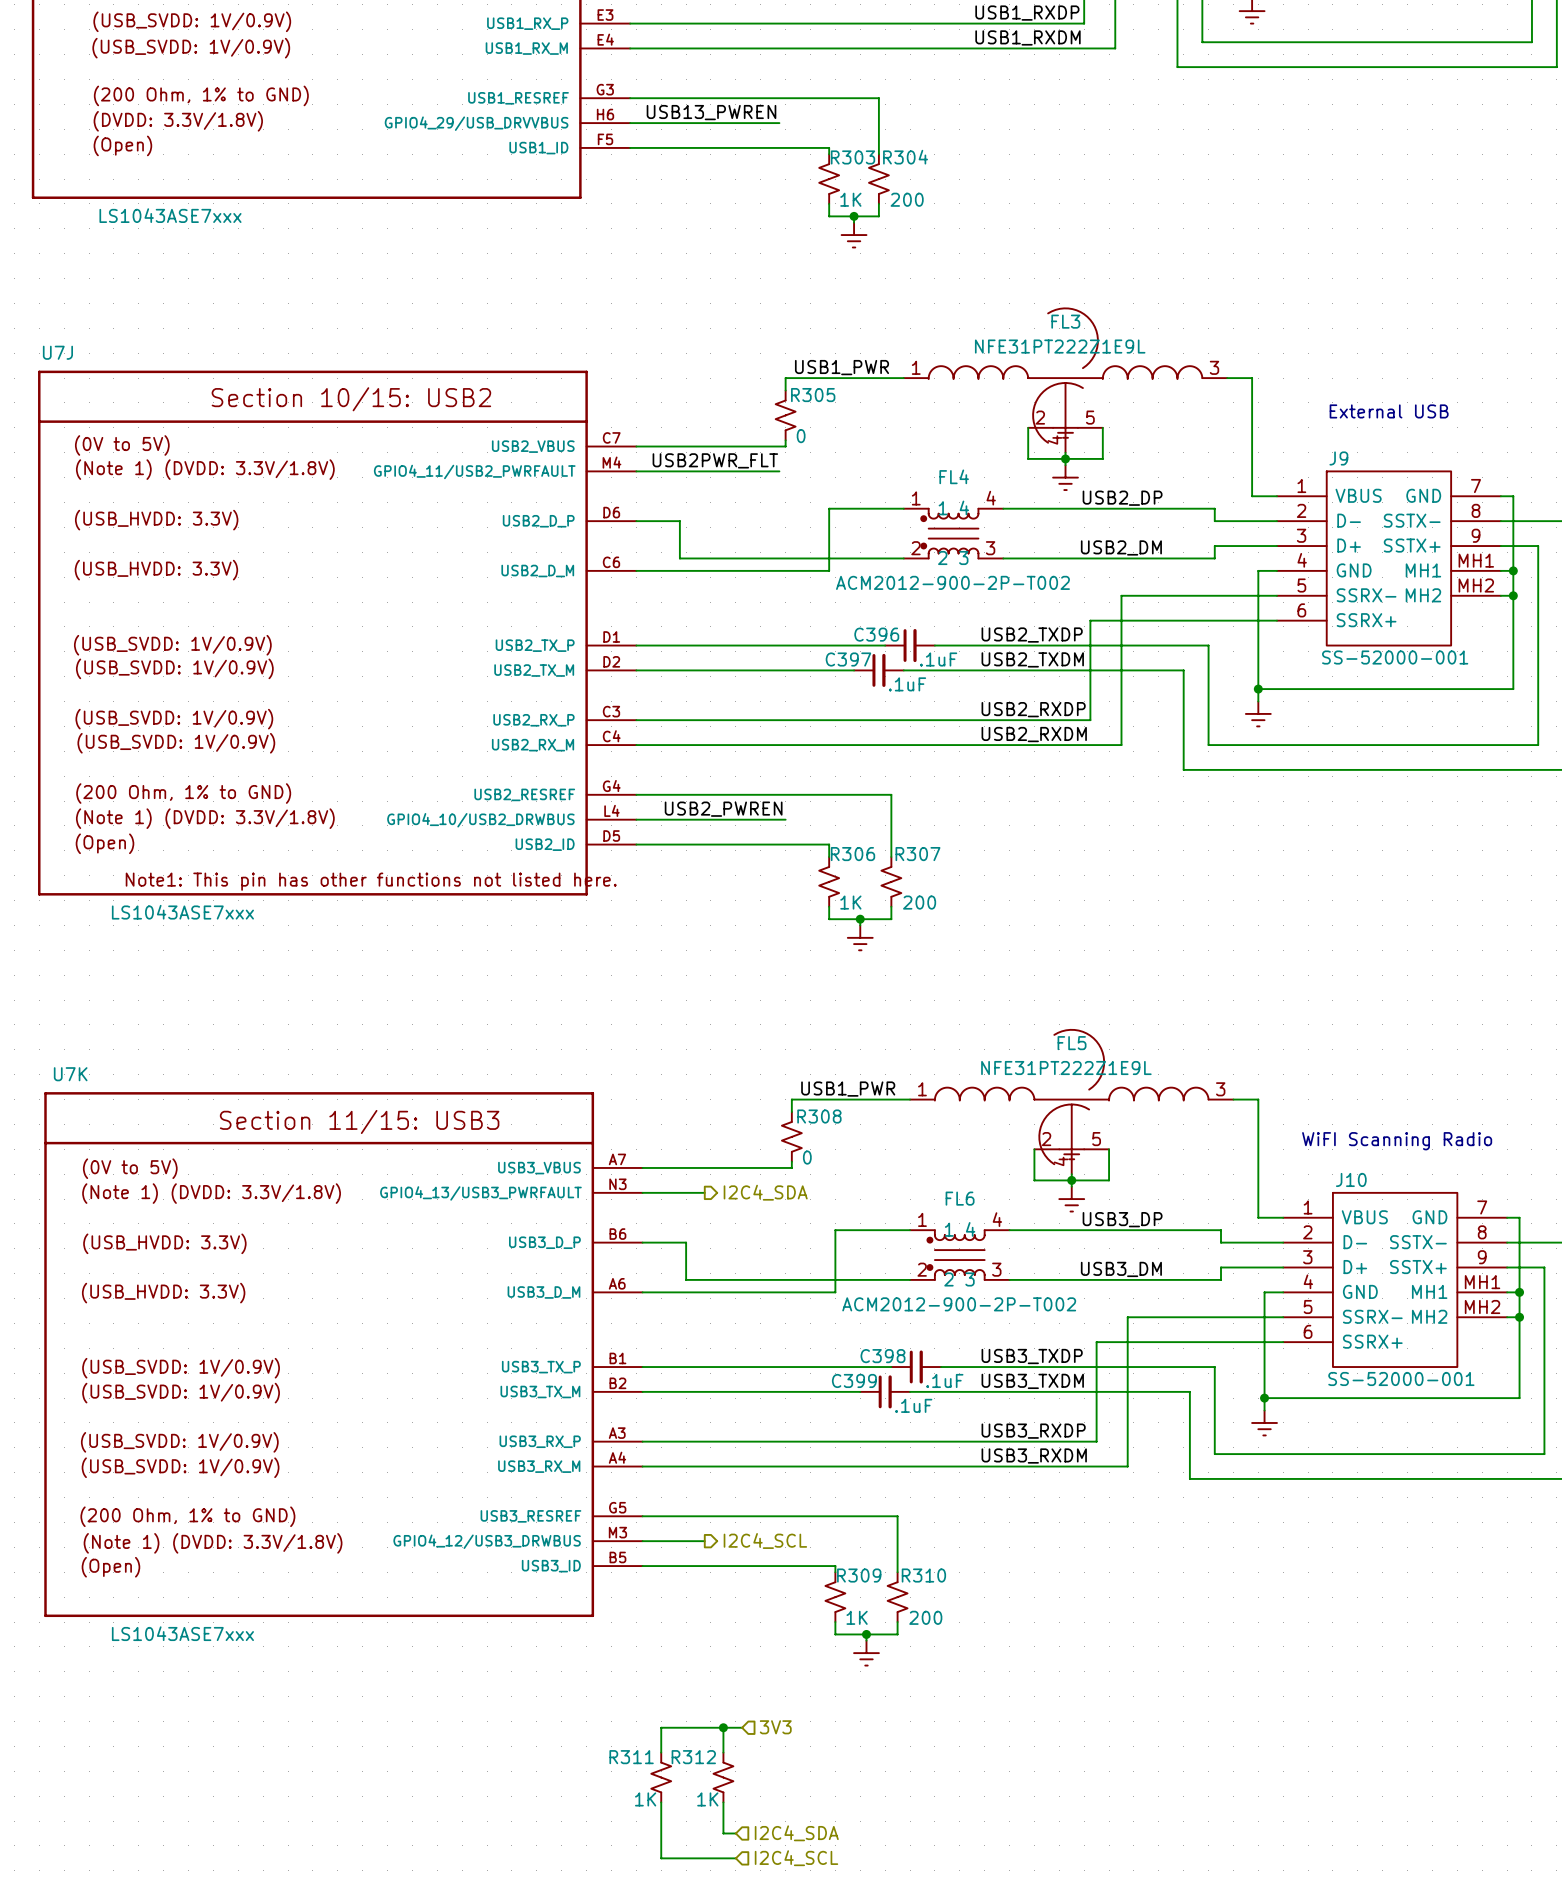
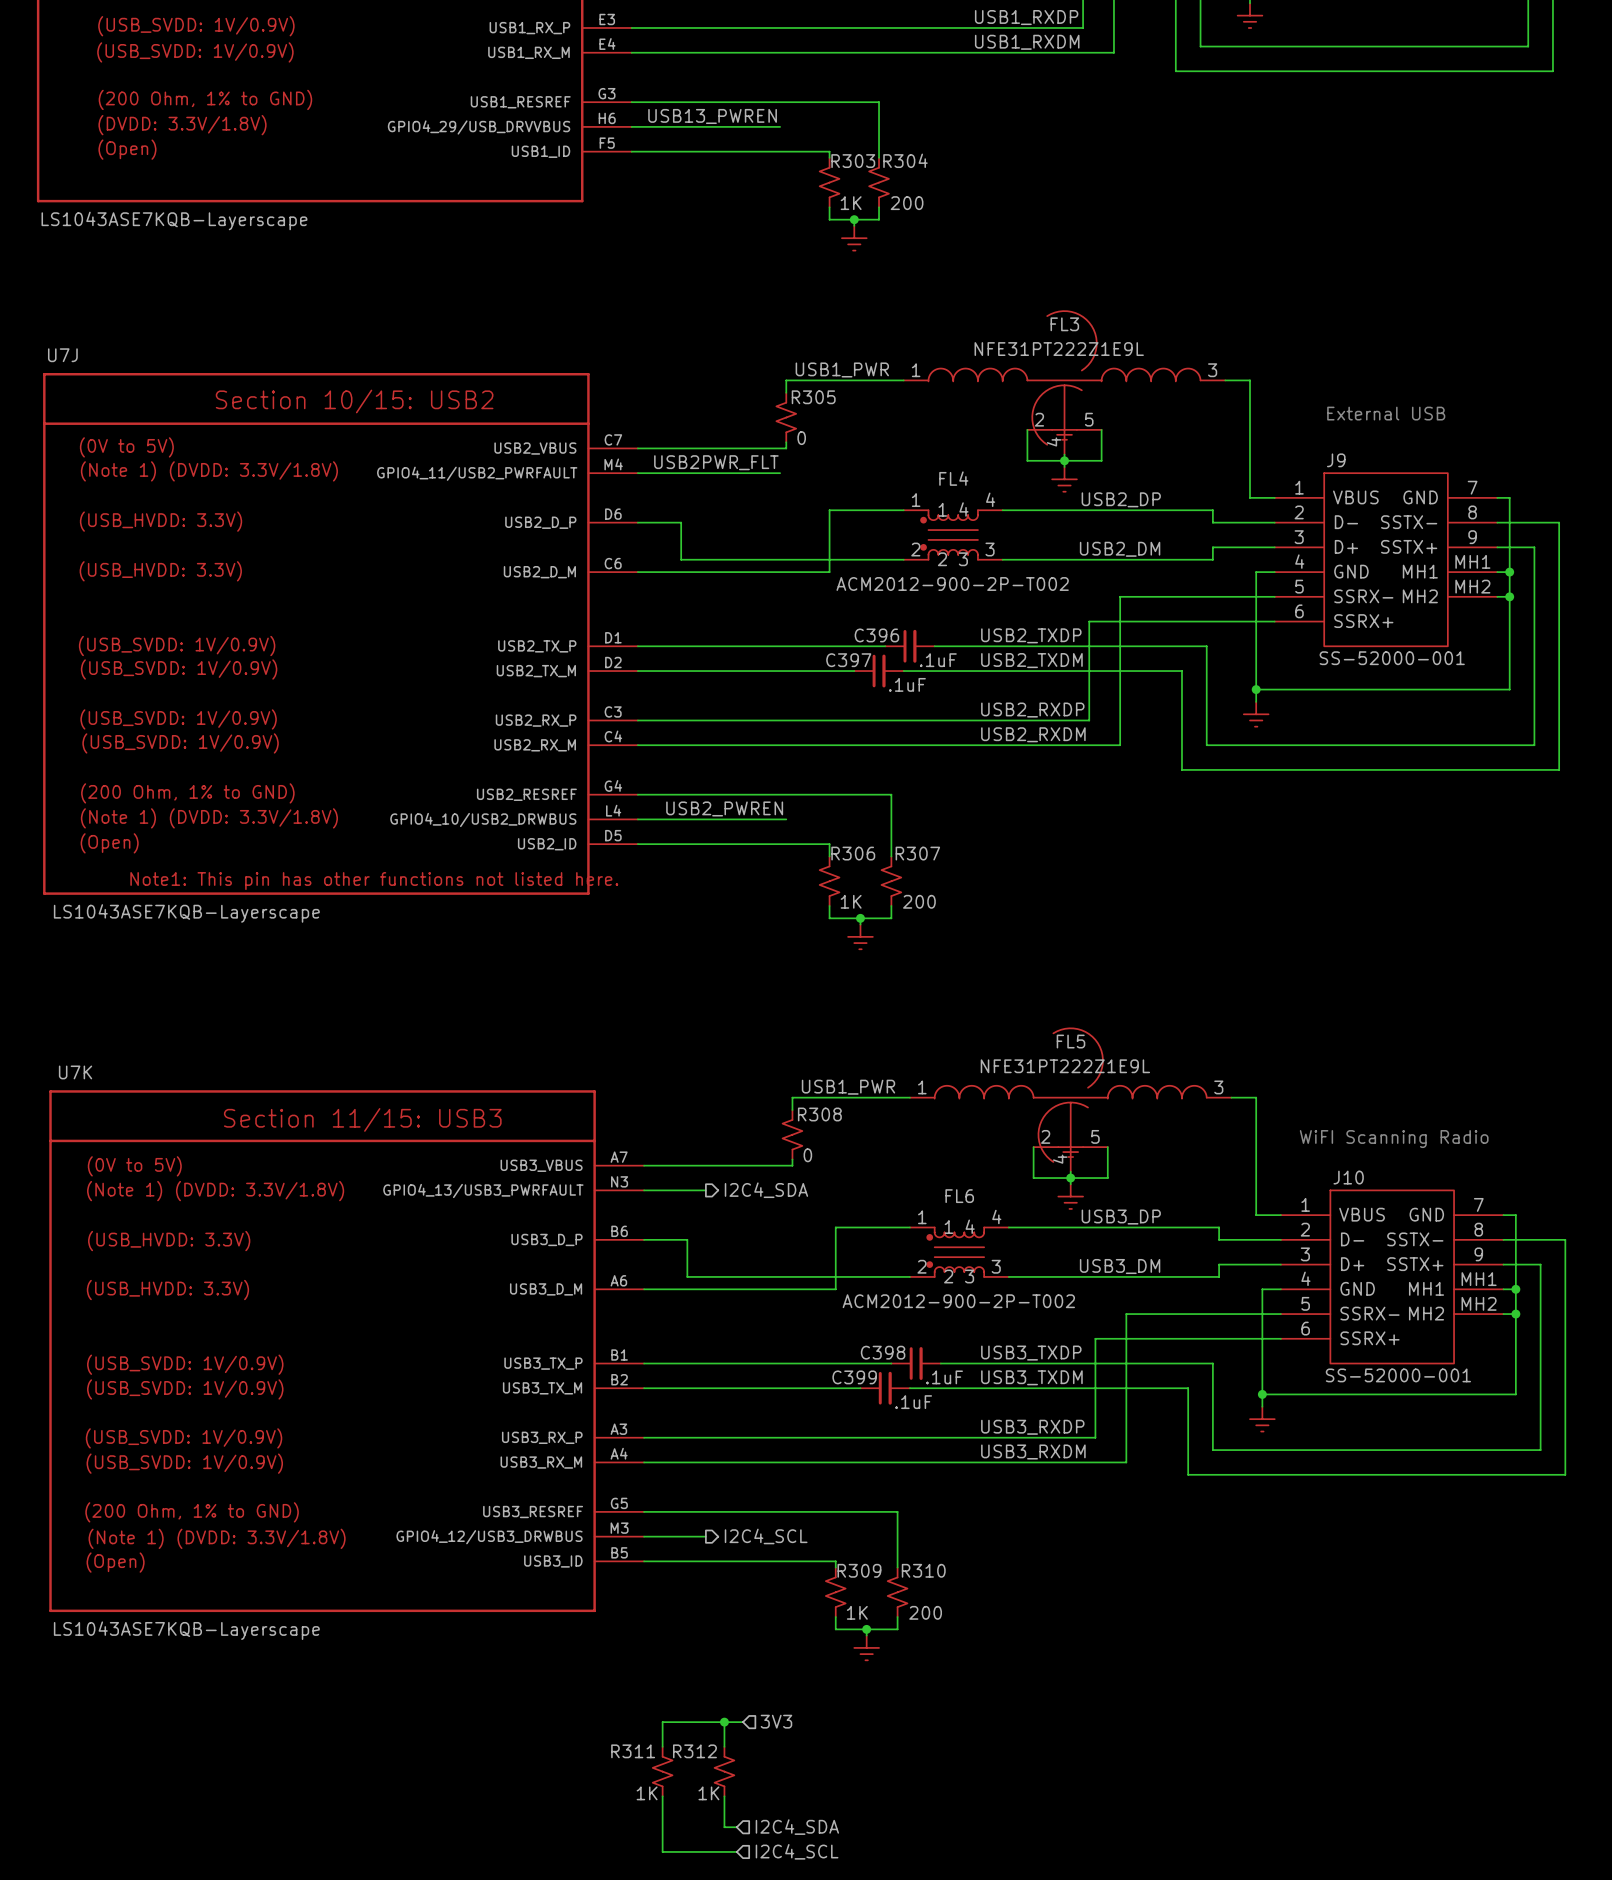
part value: LS1043ASE7xxx (170, 215) -> LS1043ASE7KQB-Layerscape (174, 220)
U7J value: LS1043ASE7xxx (182, 912) -> LS1043ASE7KQB-Layerscape (186, 913)
U7K value: LS1043ASE7xxx (182, 1633) -> LS1043ASE7KQB-Layerscape (186, 1630)

